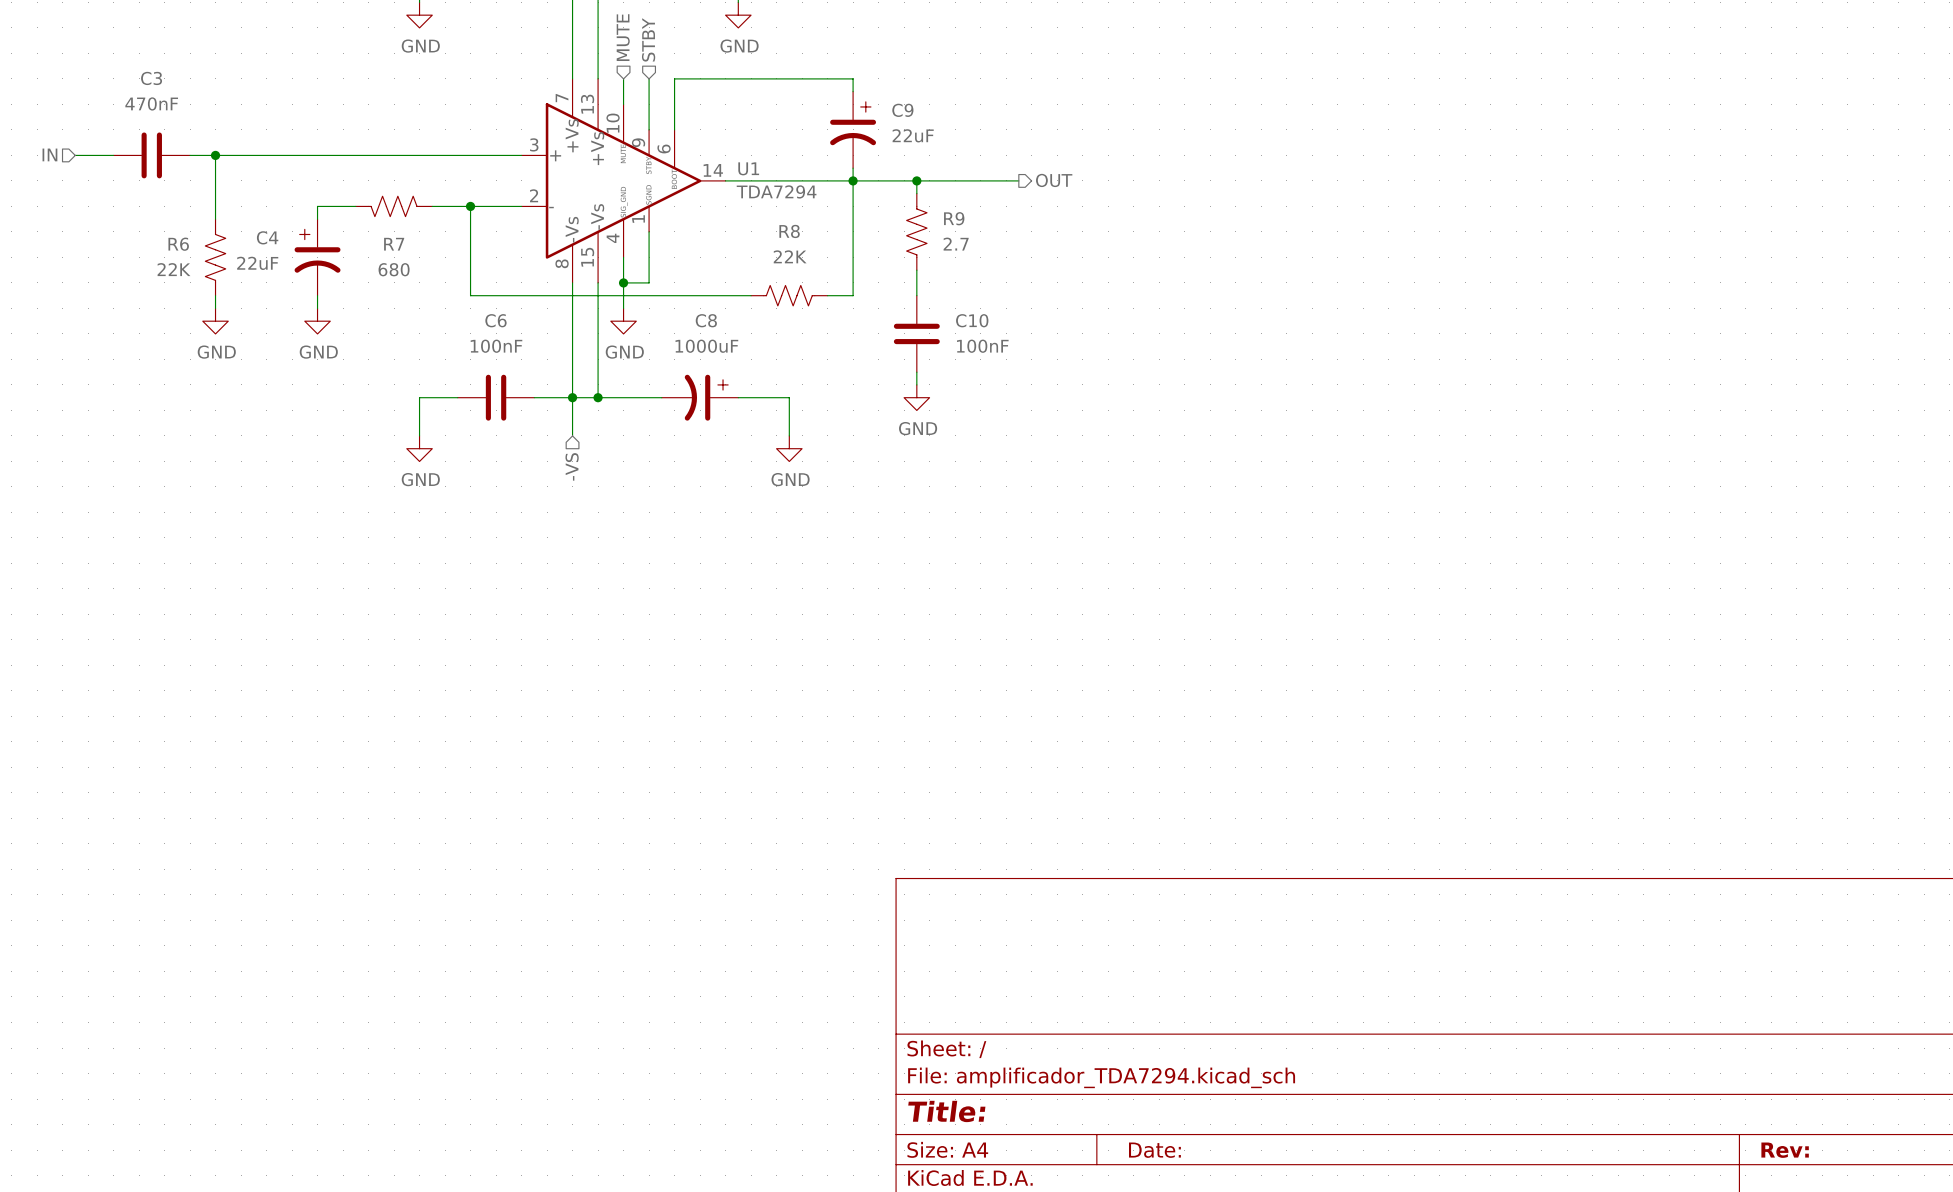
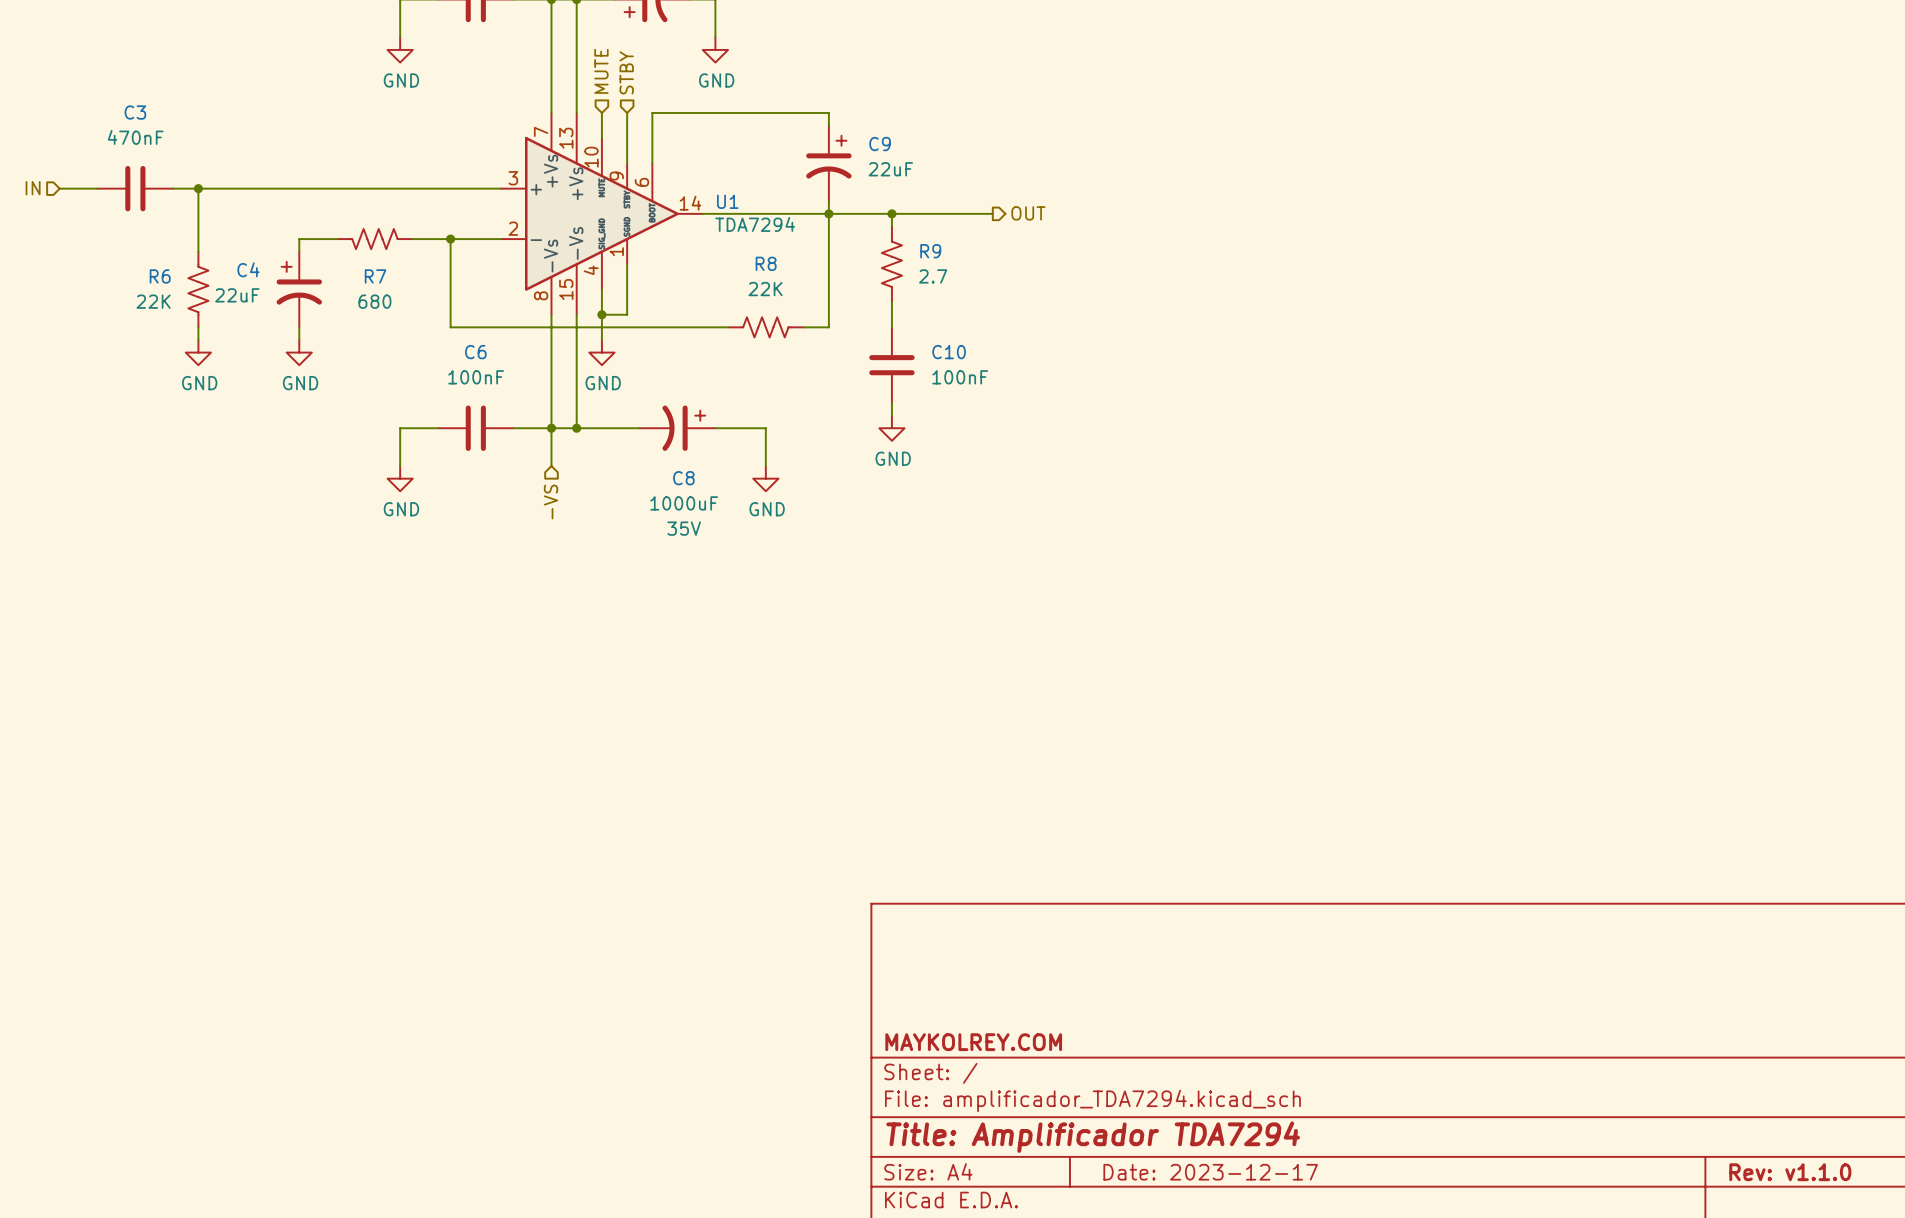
C8 name position: C8 (706, 320) -> C8 (683, 478)
C8 value position: 1000uF (706, 346) -> 1000uF (684, 503)
C8 text: none -> 35V (684, 528)
title block: none -> MAYKOLREY.COM (973, 1042)
title block: Title: (946, 1111) -> Title: Amplificador TDA7294 (1093, 1137)
title block: Date: (1154, 1150) -> Date: 2023-12-17 (1210, 1172)
title block: Rev: (1785, 1150) -> Rev: v1.1.0 (1790, 1172)

